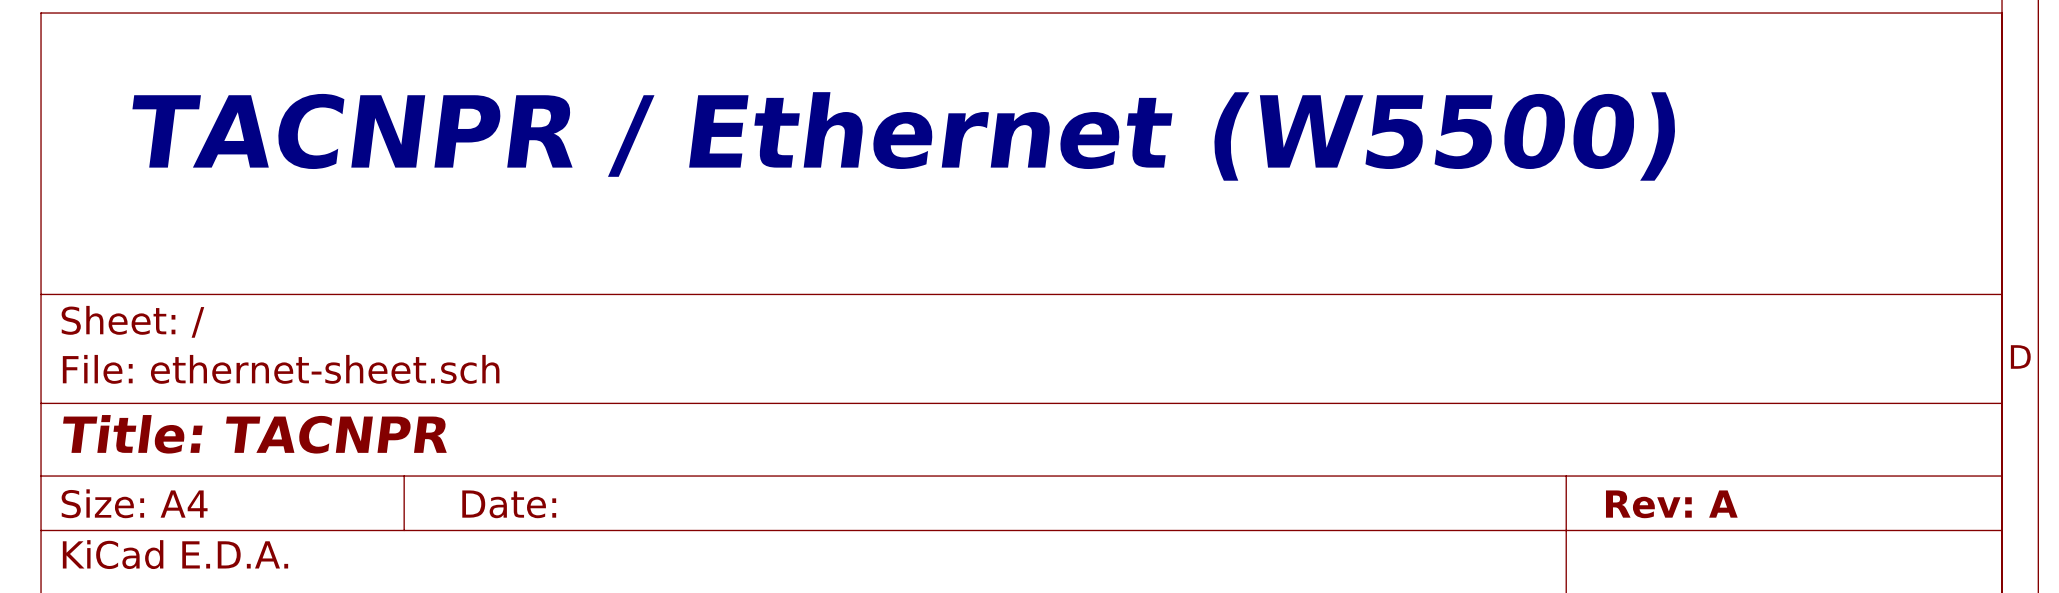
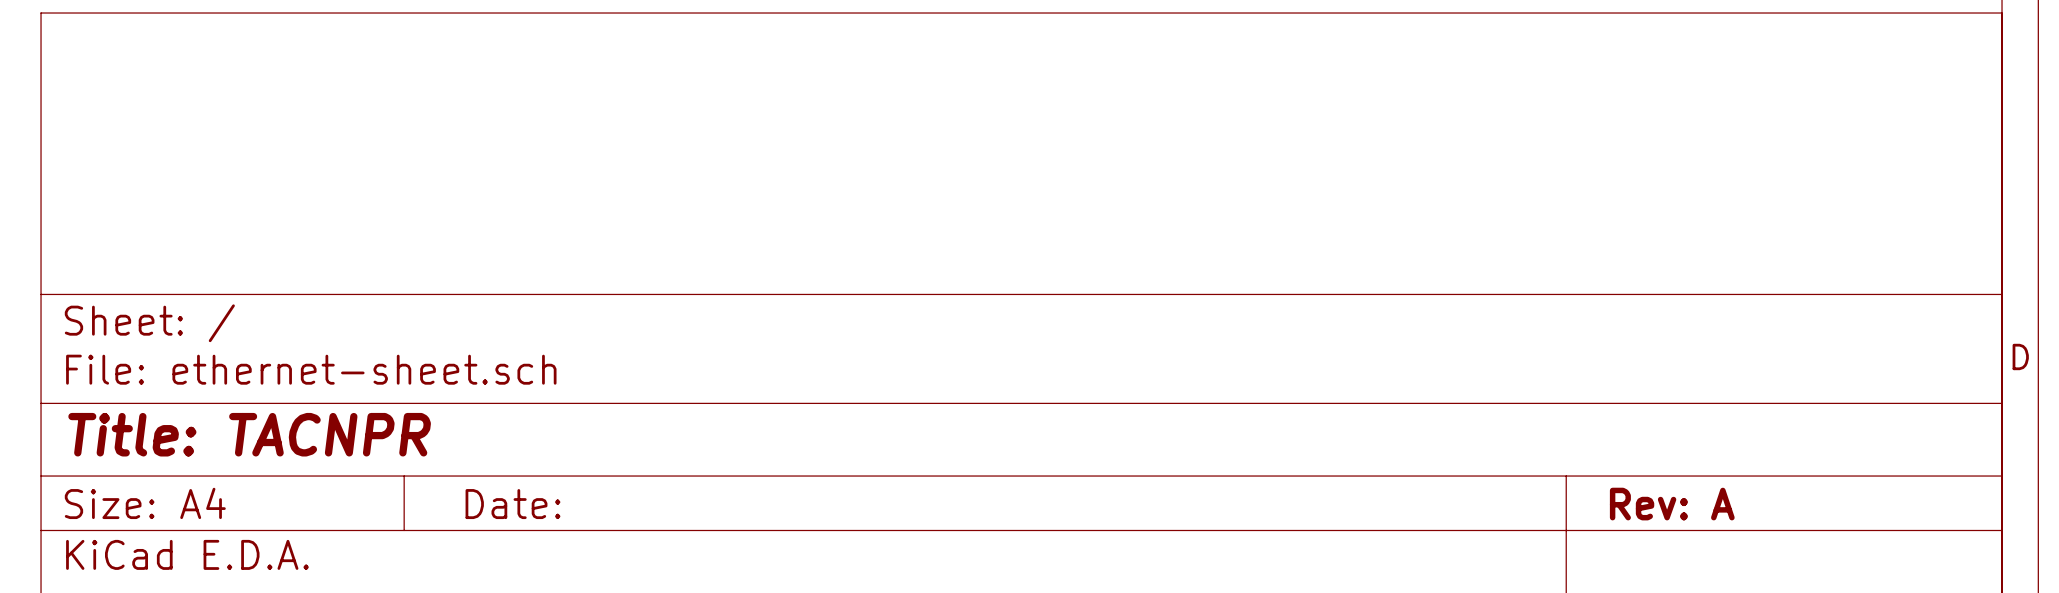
text: TACNPR / Ethernet (W5500) (904, 136) -> none

